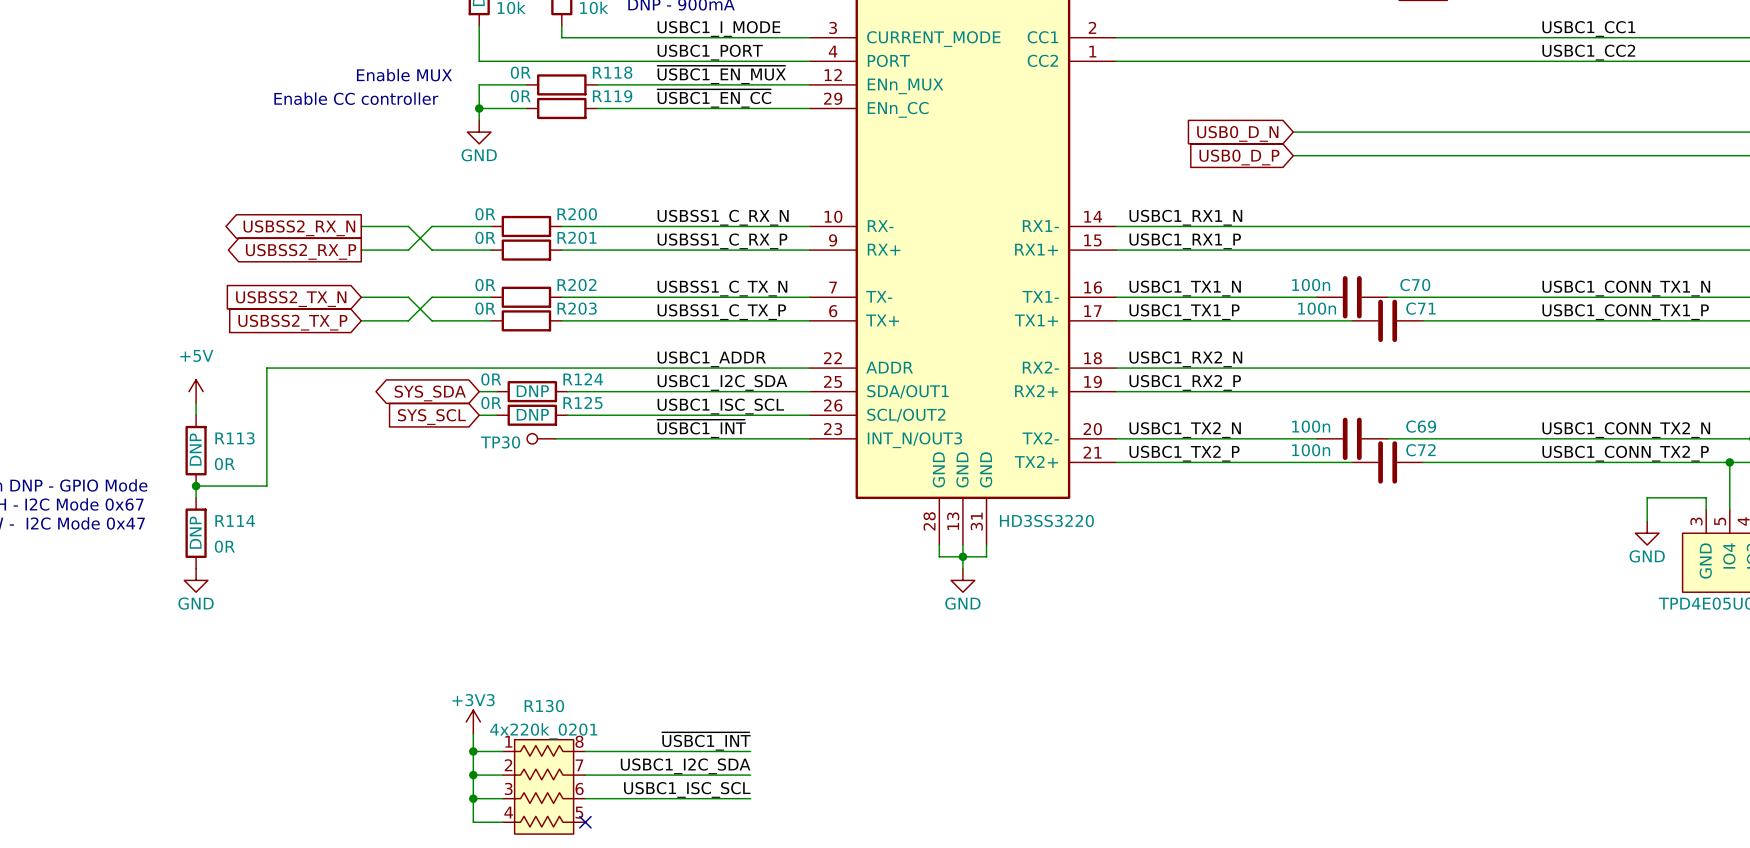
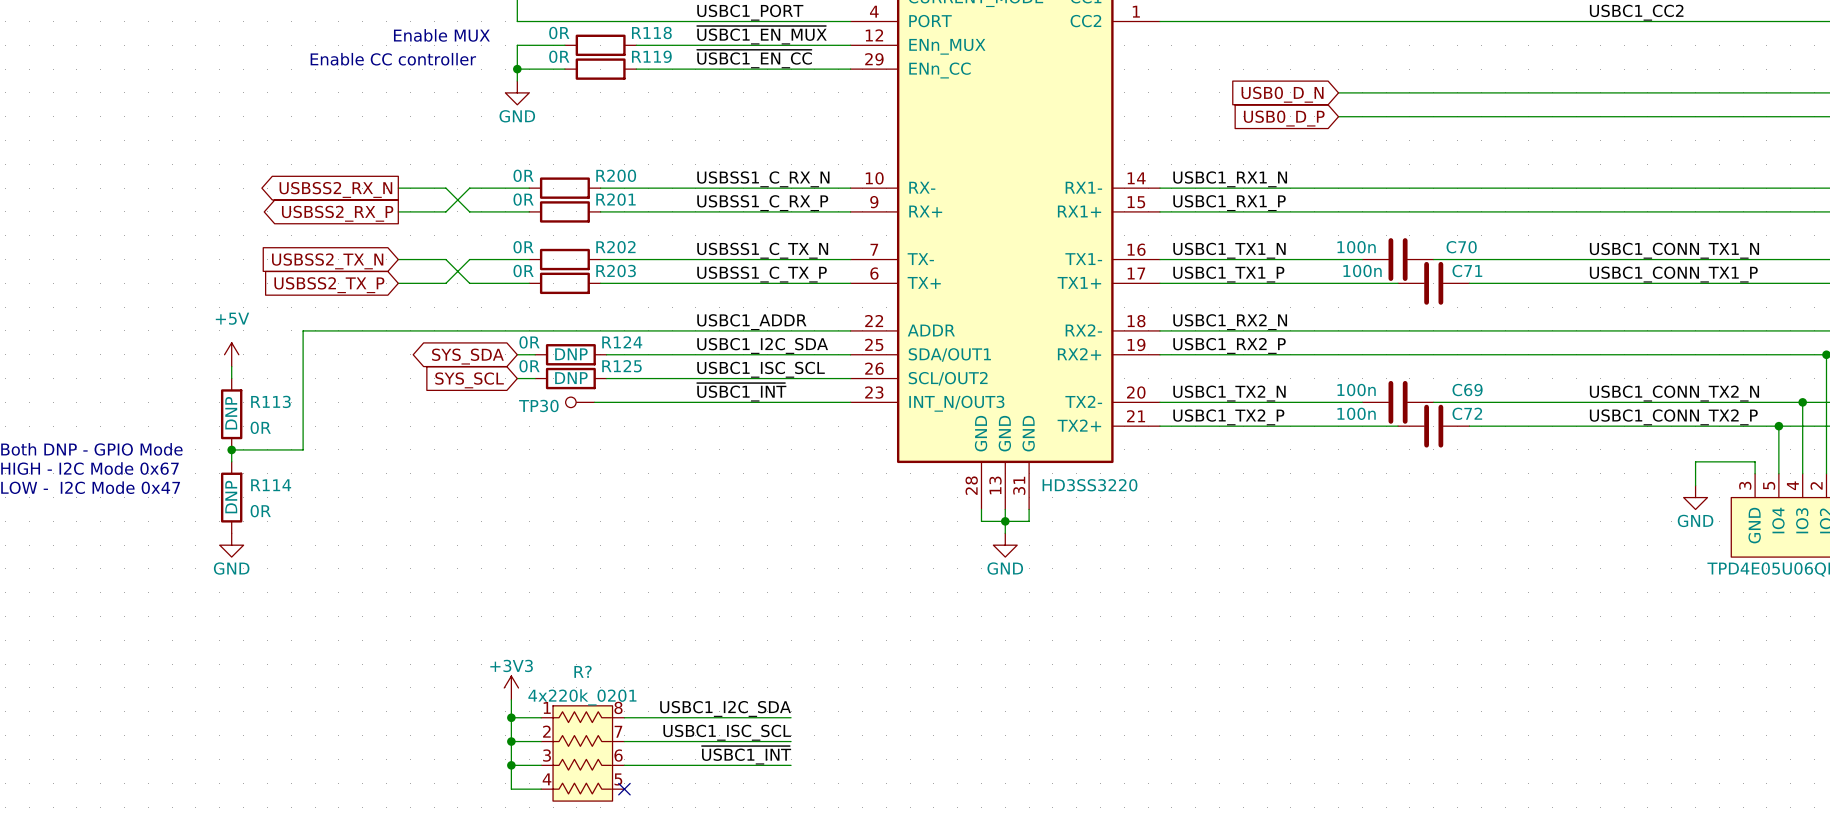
R130 name: R130 (544, 706) -> R? (583, 671)
label: ~{USBC1_INT} (706, 741) -> USBC1_I2C_SDA (725, 708)
label: USBC1_I2C_SDA (685, 766) -> USBC1_ISC_SCL (727, 732)
label: USBC1_ISC_SCL (687, 789) -> ~{USBC1_INT} (746, 755)

